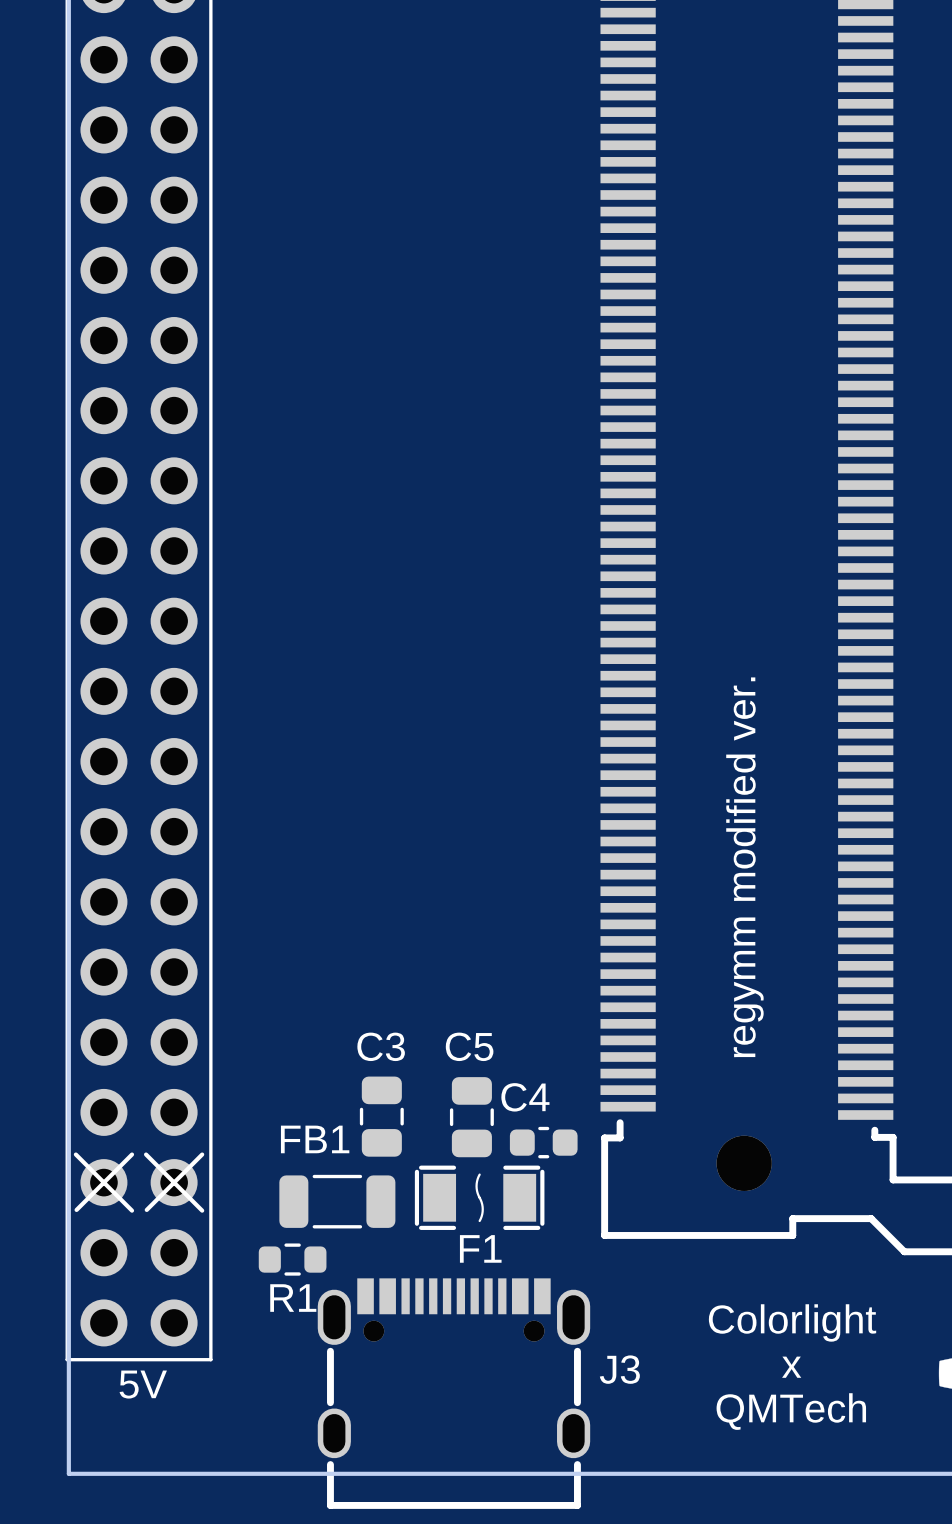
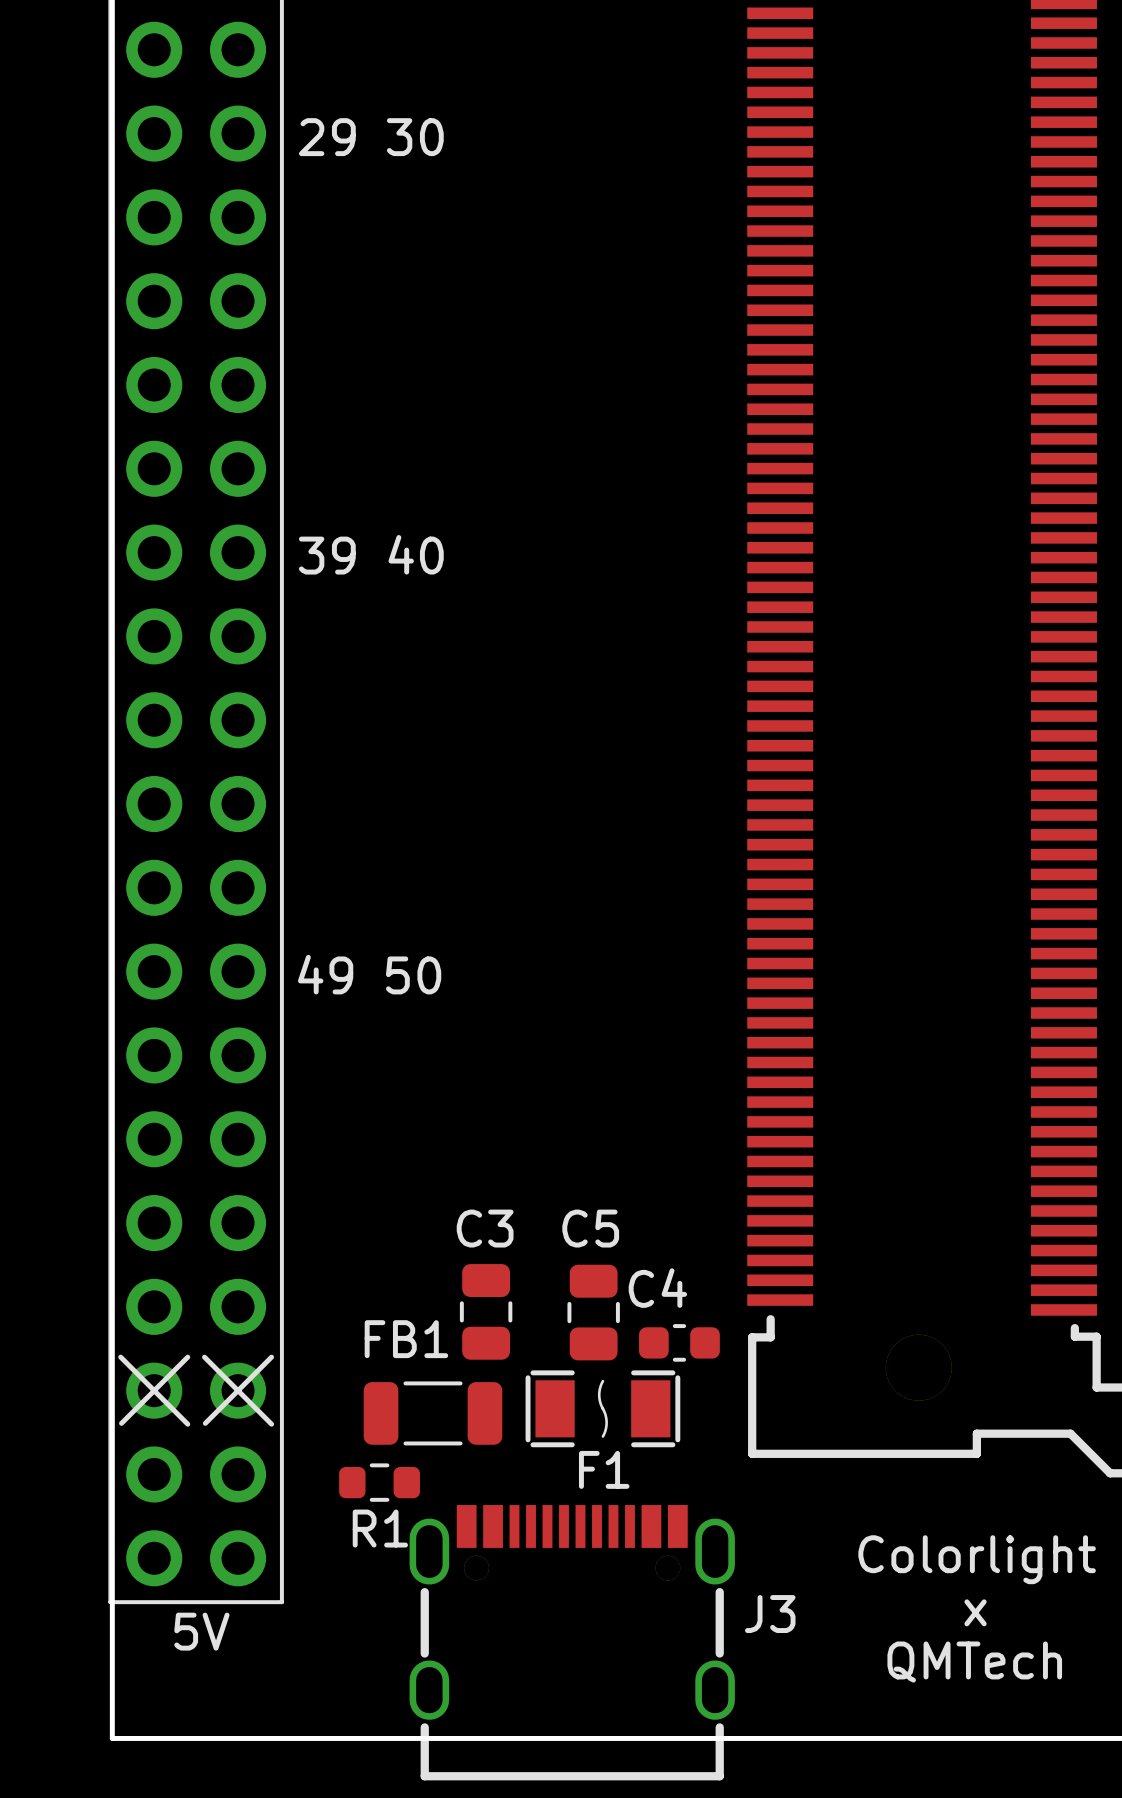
text: none -> 29 30 (371, 137)
text: none -> 39 40 (371, 554)
text: none -> 49 50 (369, 974)
text: regymm modified ver. (744, 867) -> none

